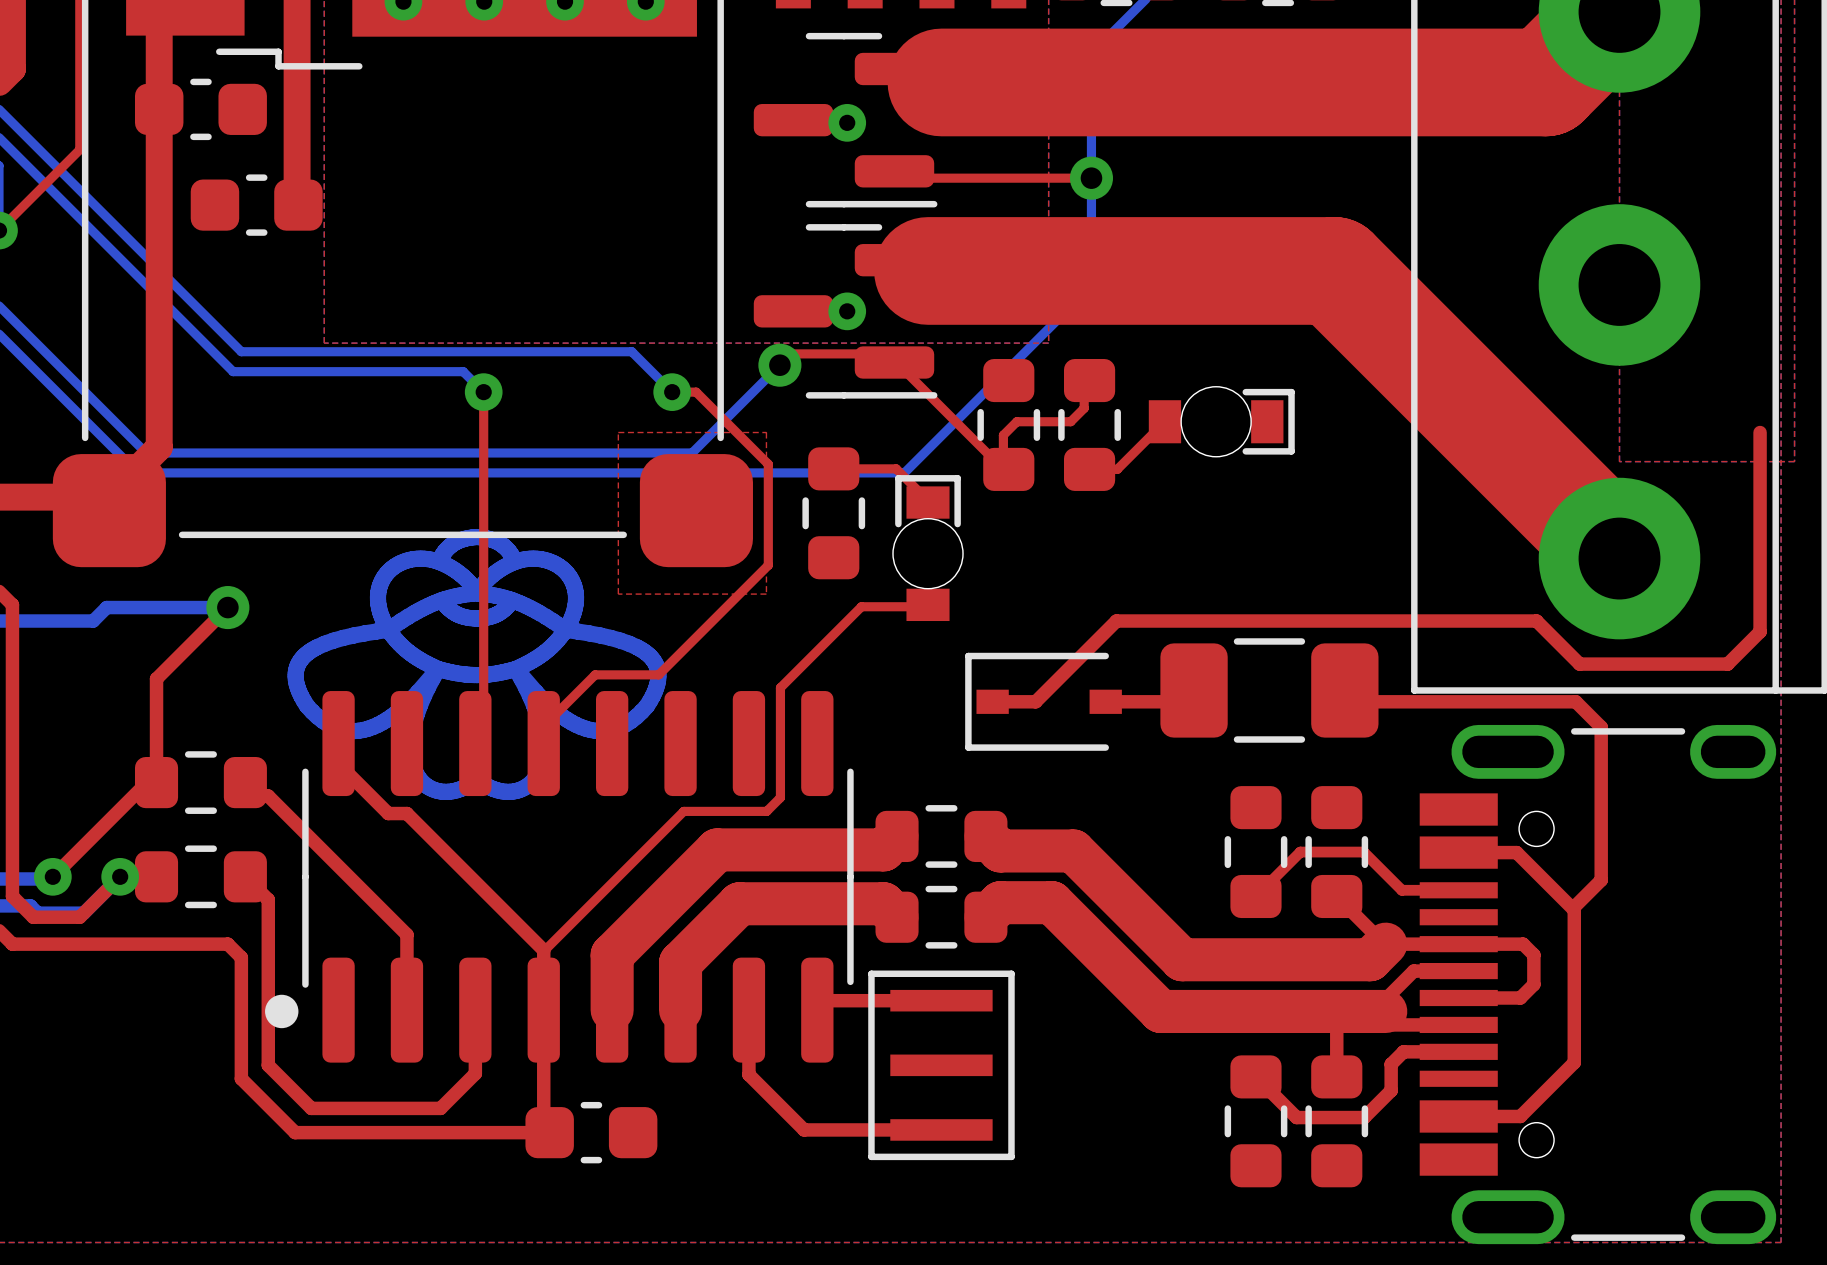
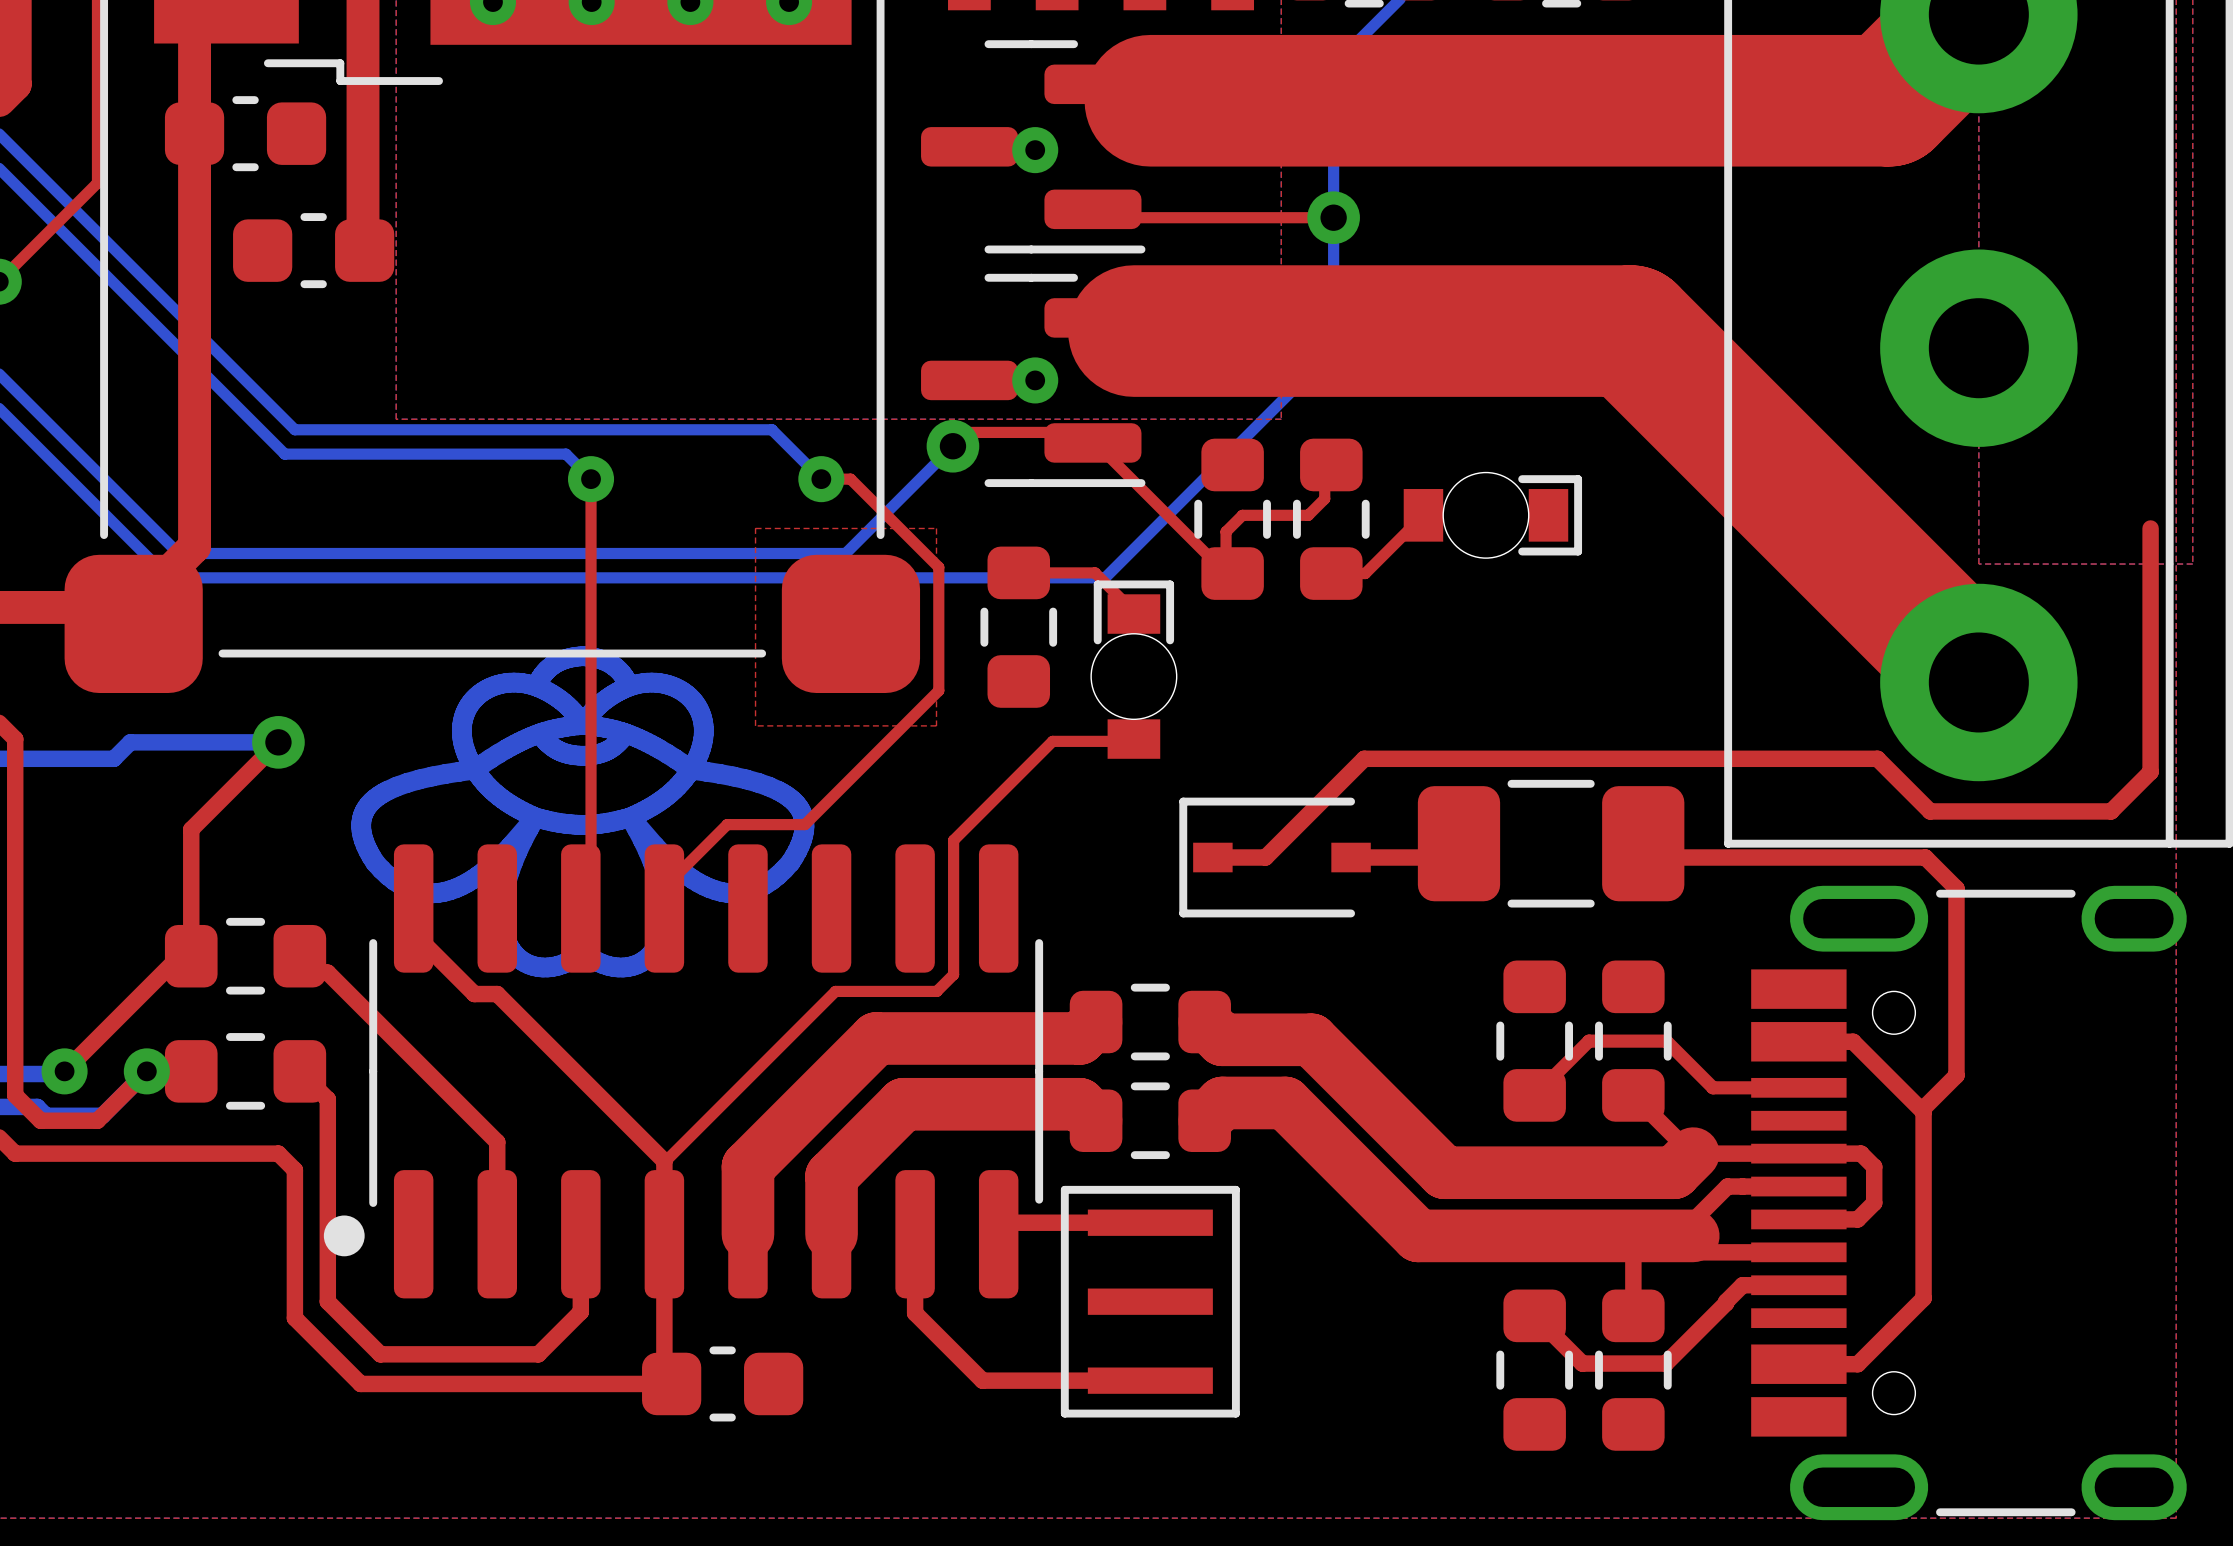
part position: (1597, 984) -> (1968, 1202)
top track: (1426, 1051) (1403, 1051) (1391, 1064) (1391, 1090) (1364, 1117) (1296, 1117) (1295, 1115) -> (1742, 1285) (1665, 1363) (1582, 1363)

